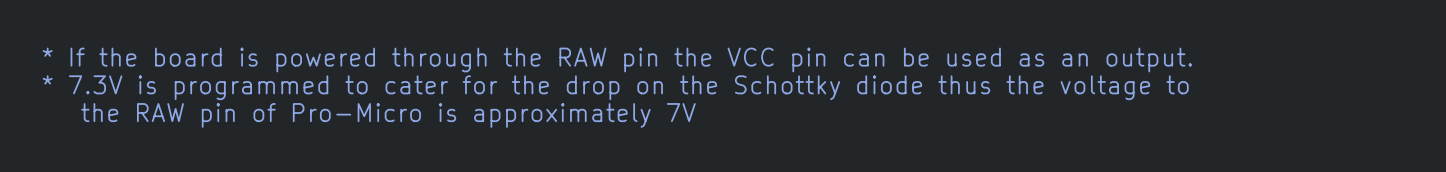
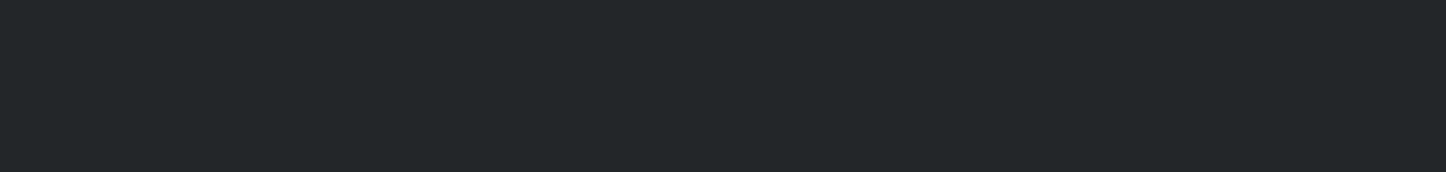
text: * If the board is powered through the RAW pin the VCC pin can be used as an output. (617, 59) -> none
text: * 7.3V is programmed to cater for the drop on the Schottky diode thus the voltage to (615, 87) -> none
text: the RAW pin of Pro-Micro is approximately 7V (388, 115) -> none

